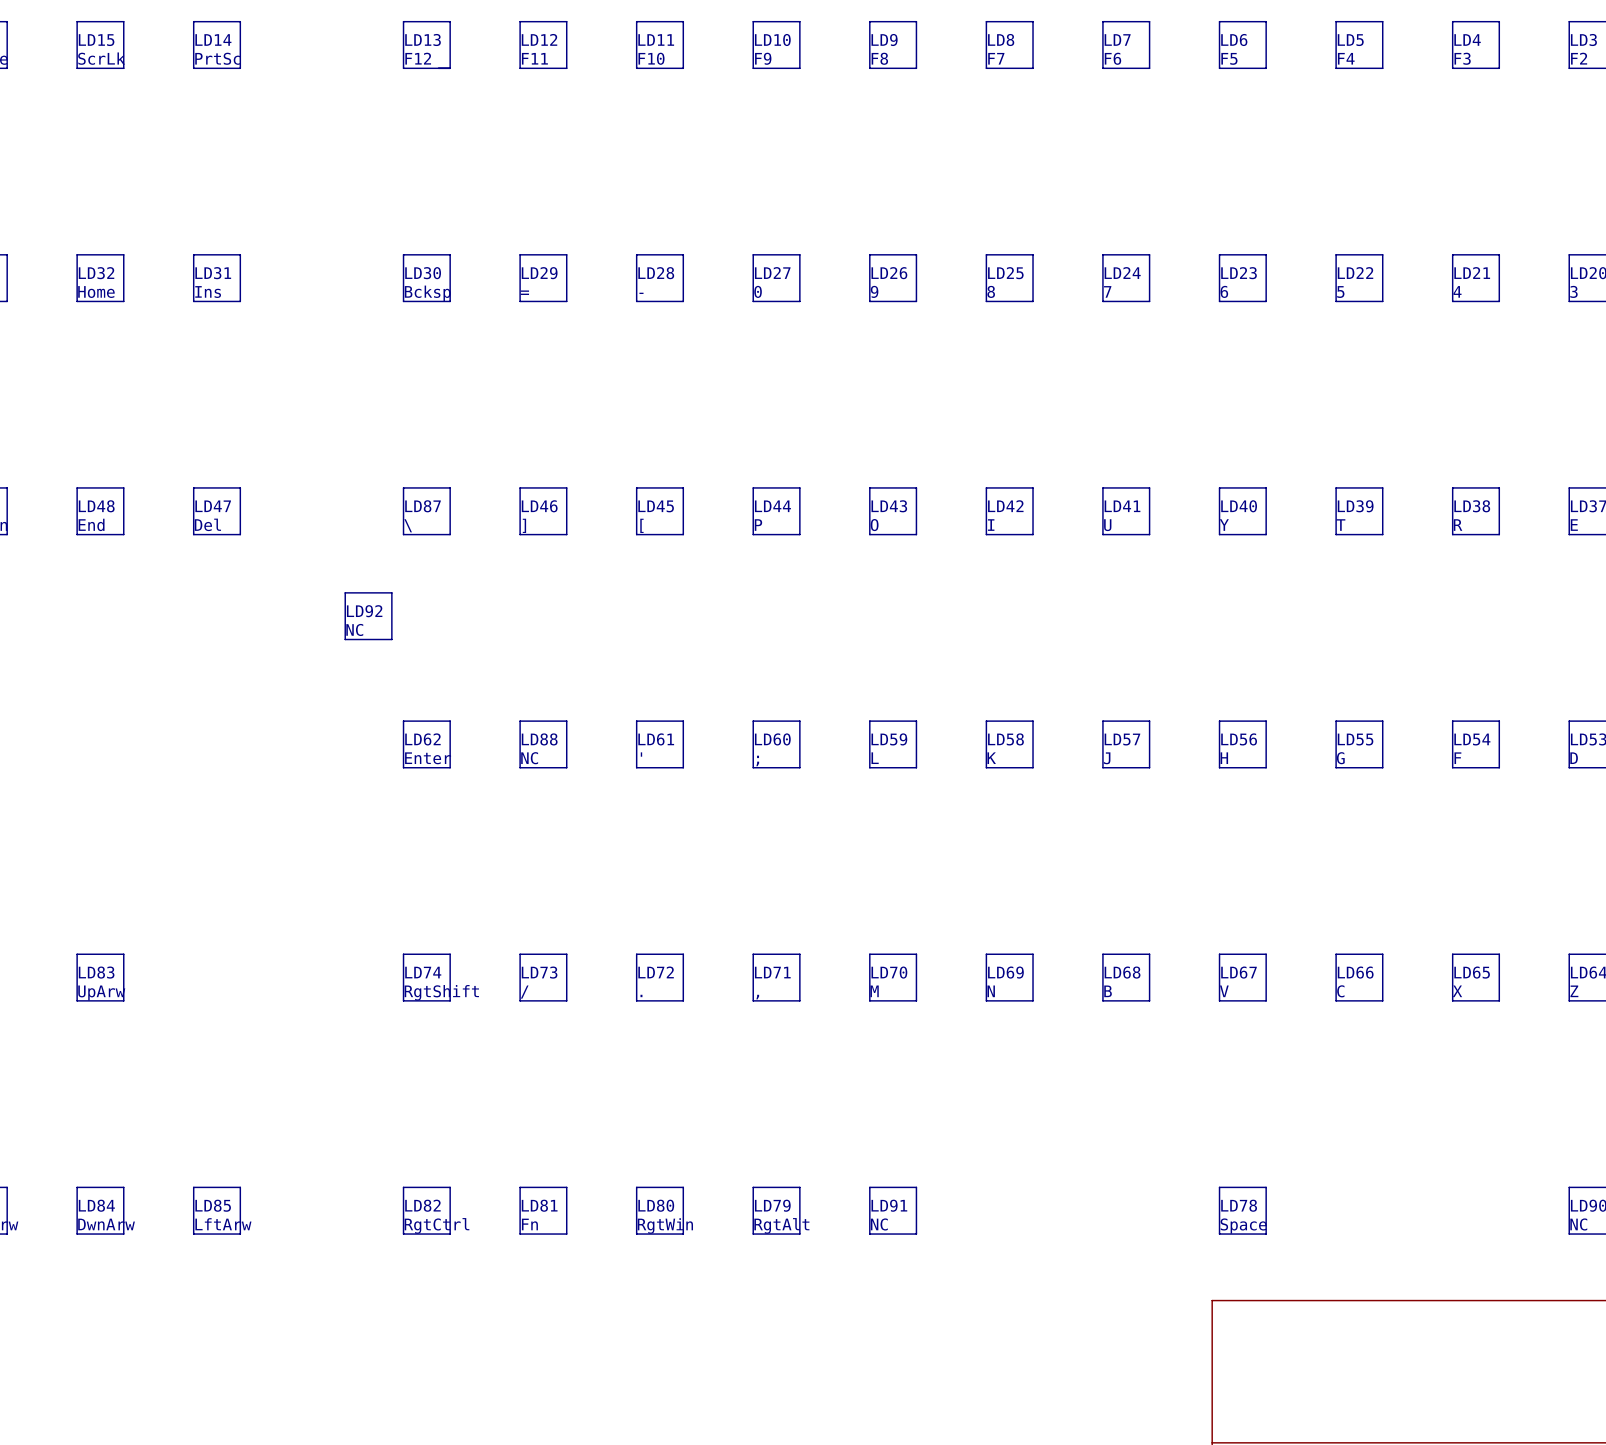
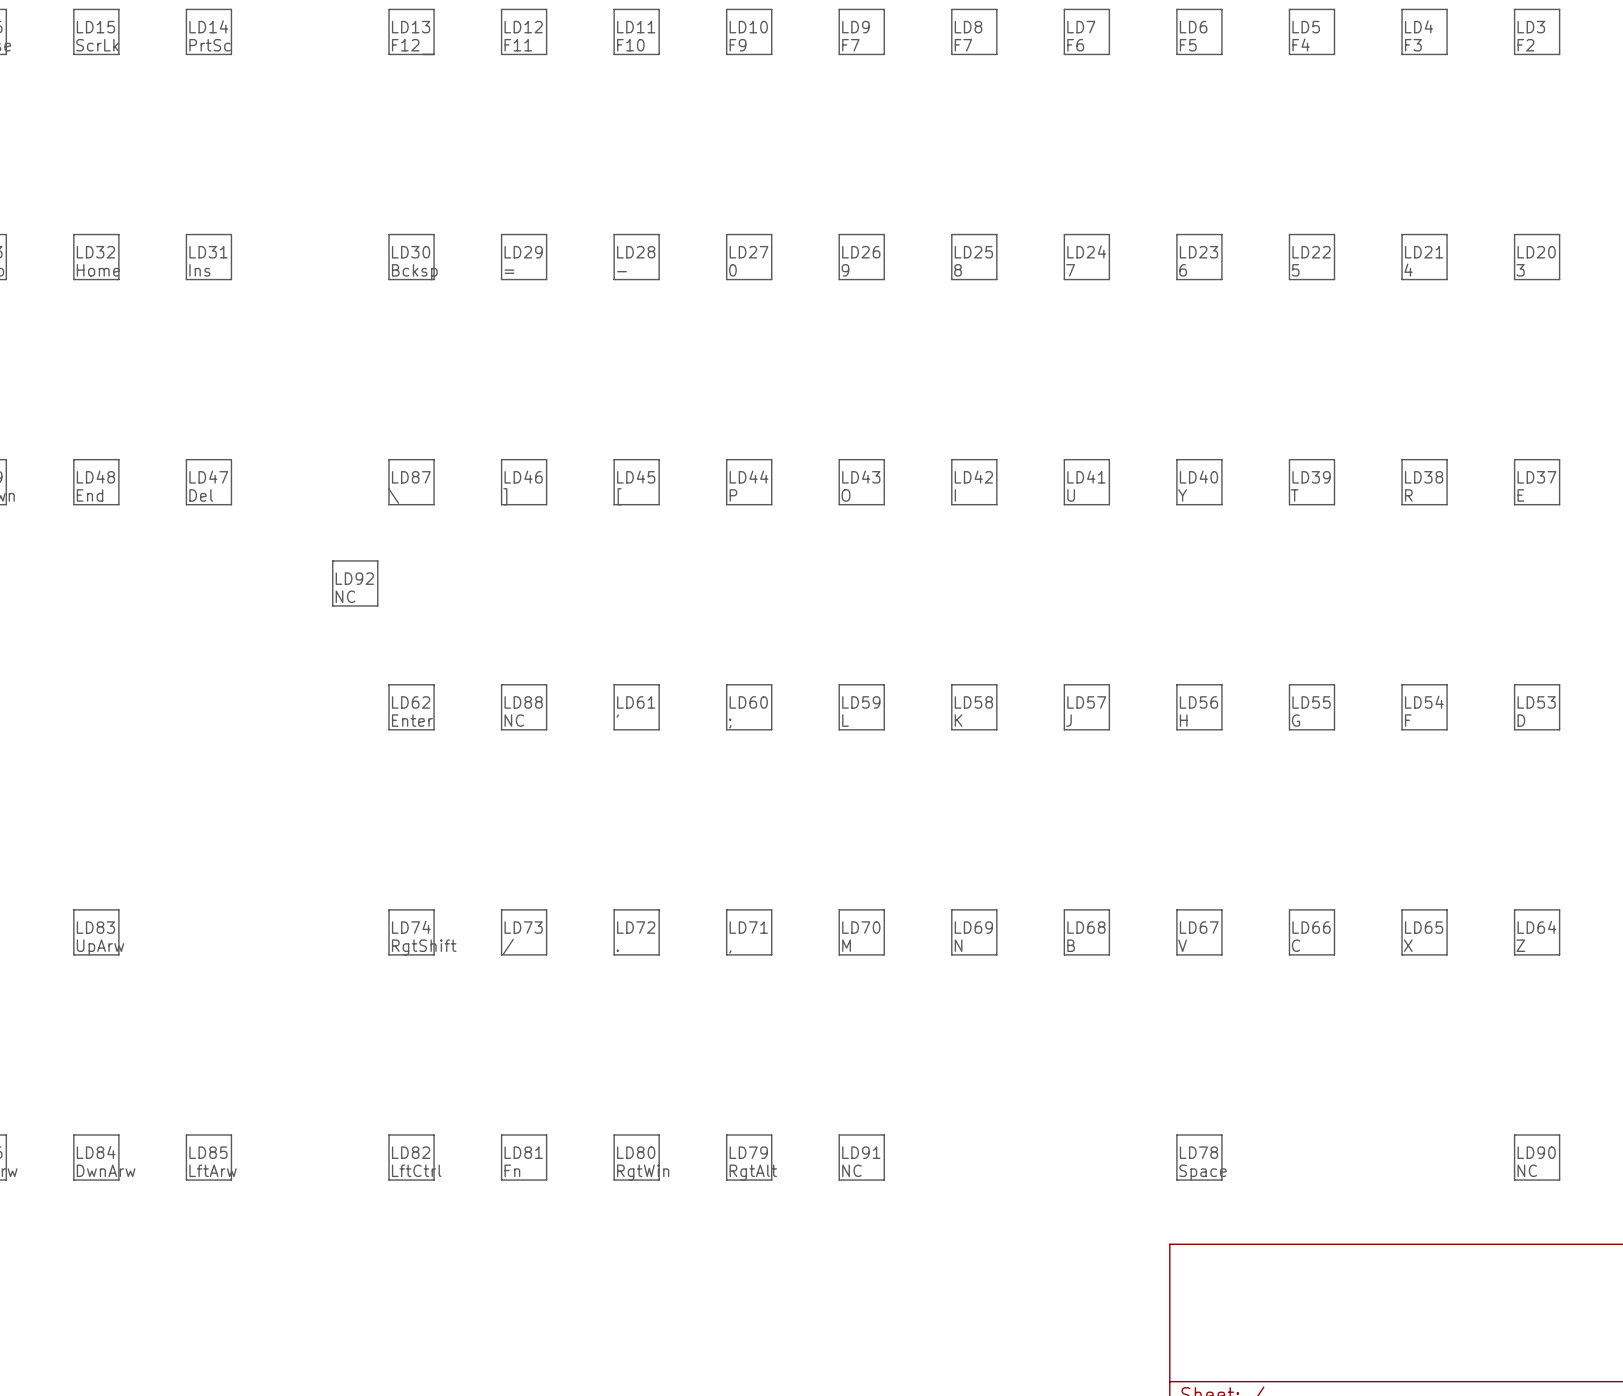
text: F8 (879, 58) -> F7 (850, 45)
text: RgtCtrl (437, 1225) -> LftCtrl (416, 1170)

